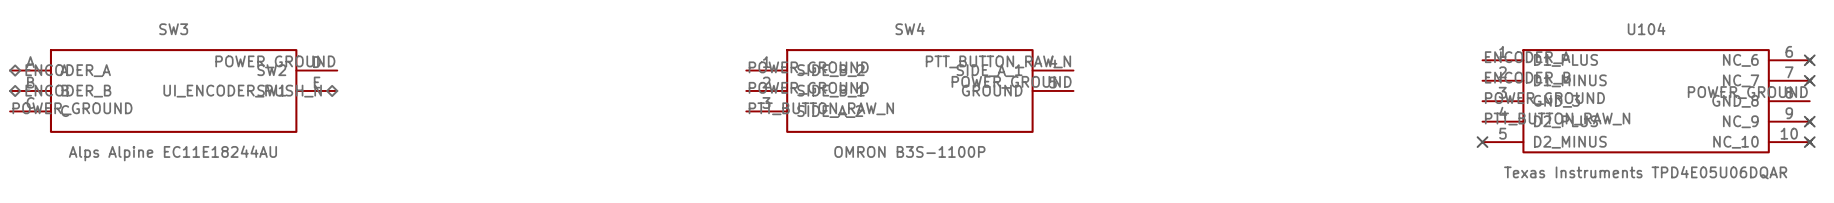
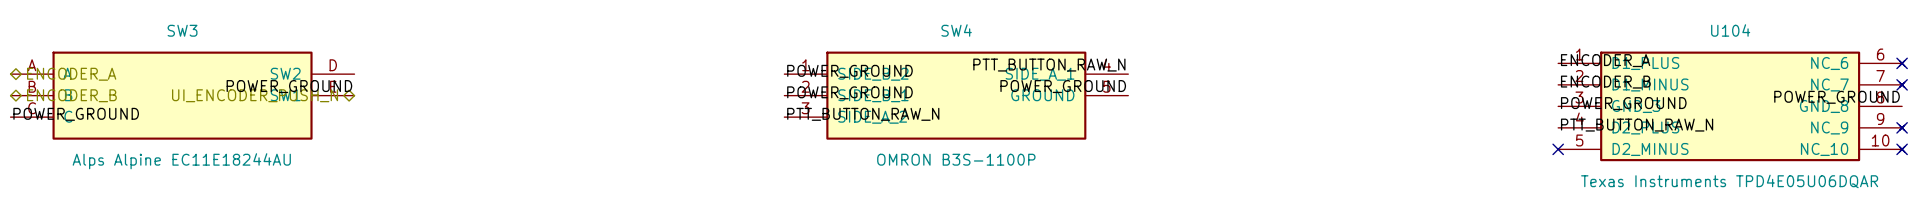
label position: POWER_GROUND (275, 61) -> POWER_GROUND (289, 86)

